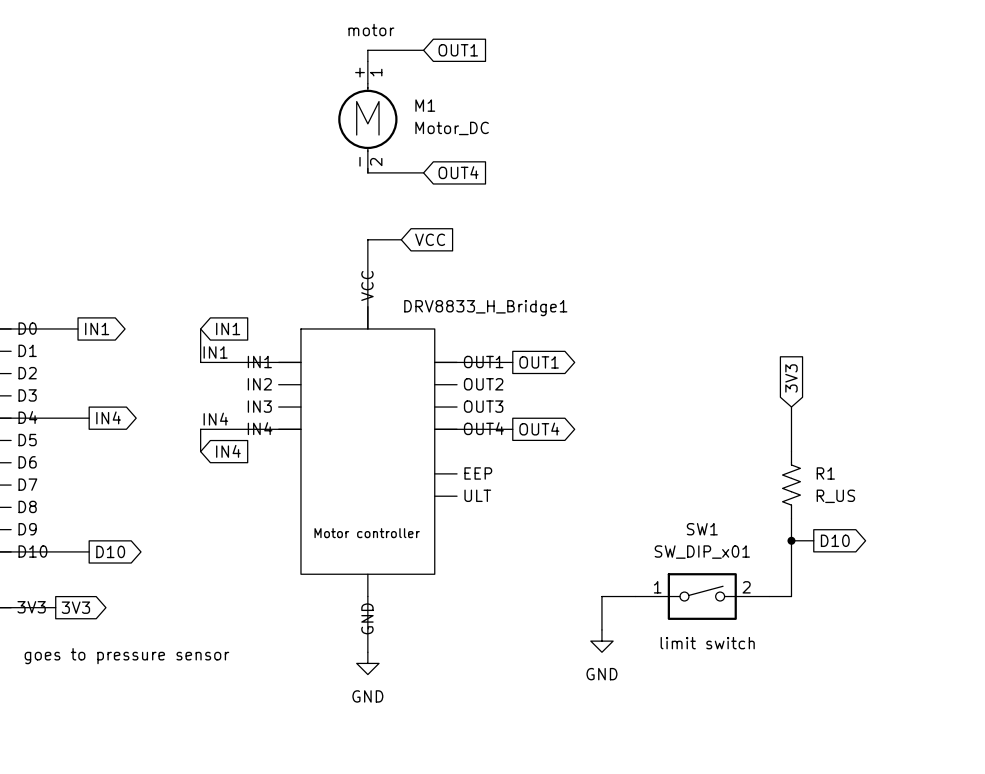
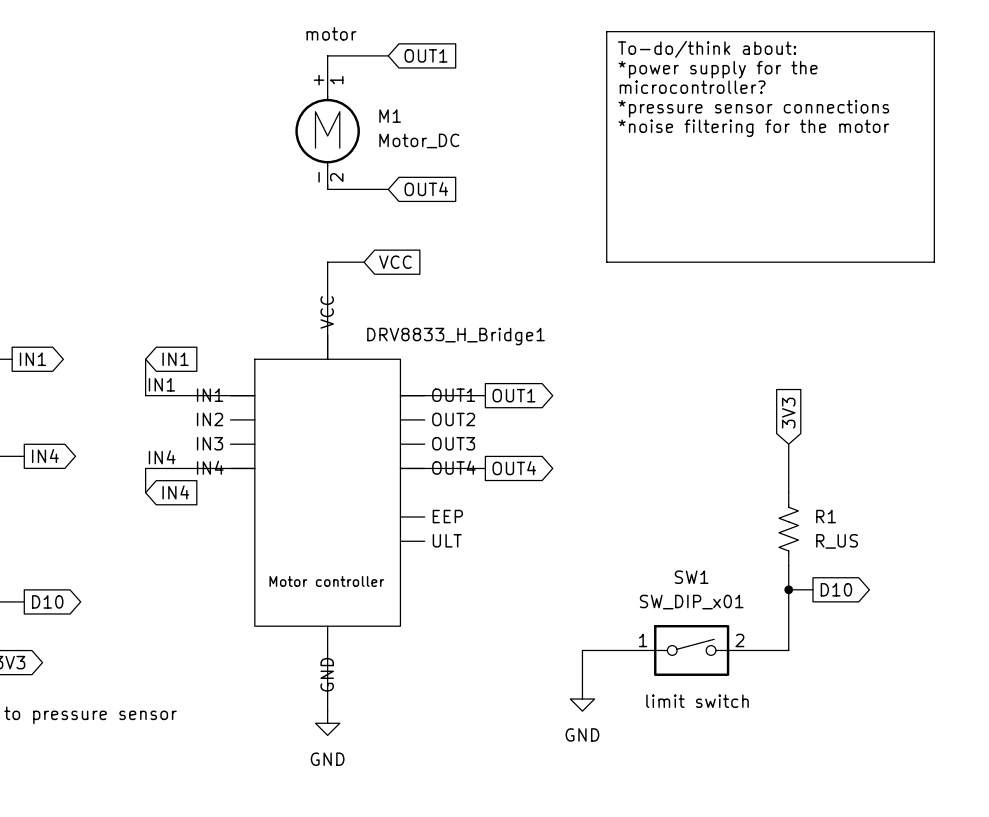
line: none -> (606, 31) (934, 31) (934, 262) (606, 262) (606, 31)
text: none -> To-do/think about: (707, 49)
text: none -> *power supply for the (718, 69)
text: none -> microcontroller? (692, 87)
text: none -> *pressure sensor connections (753, 108)
text: none -> *noise filtering for the motor (753, 128)

